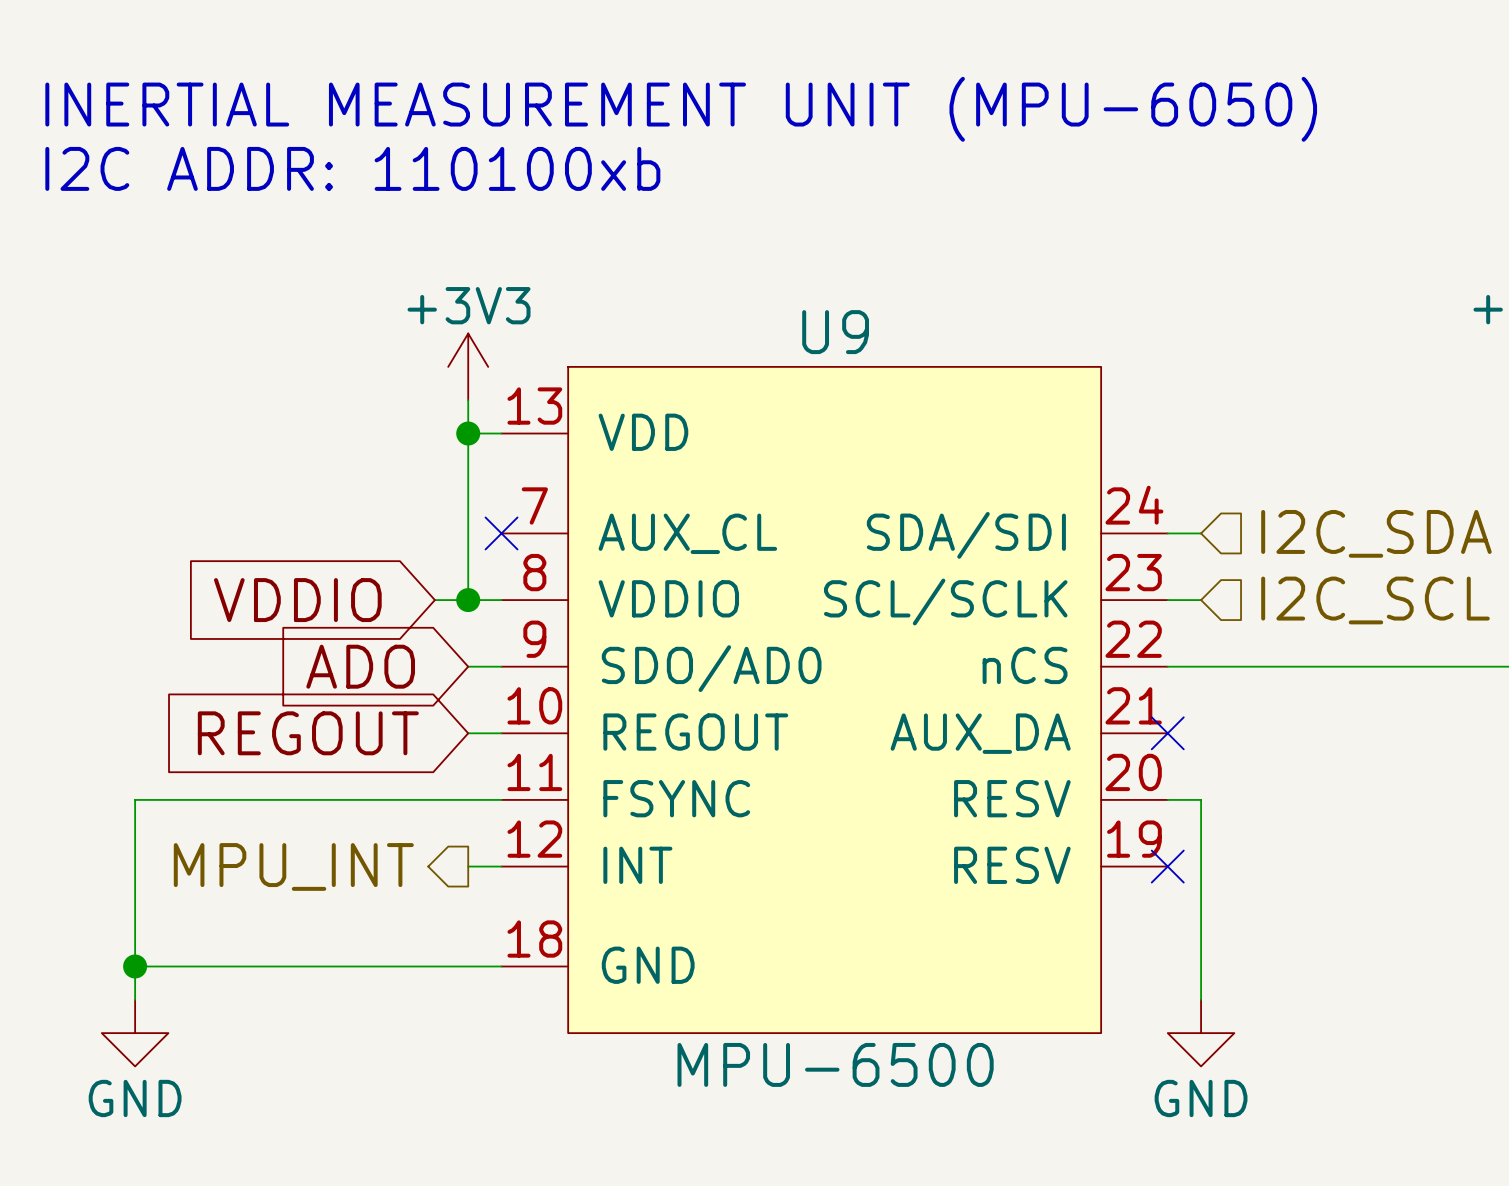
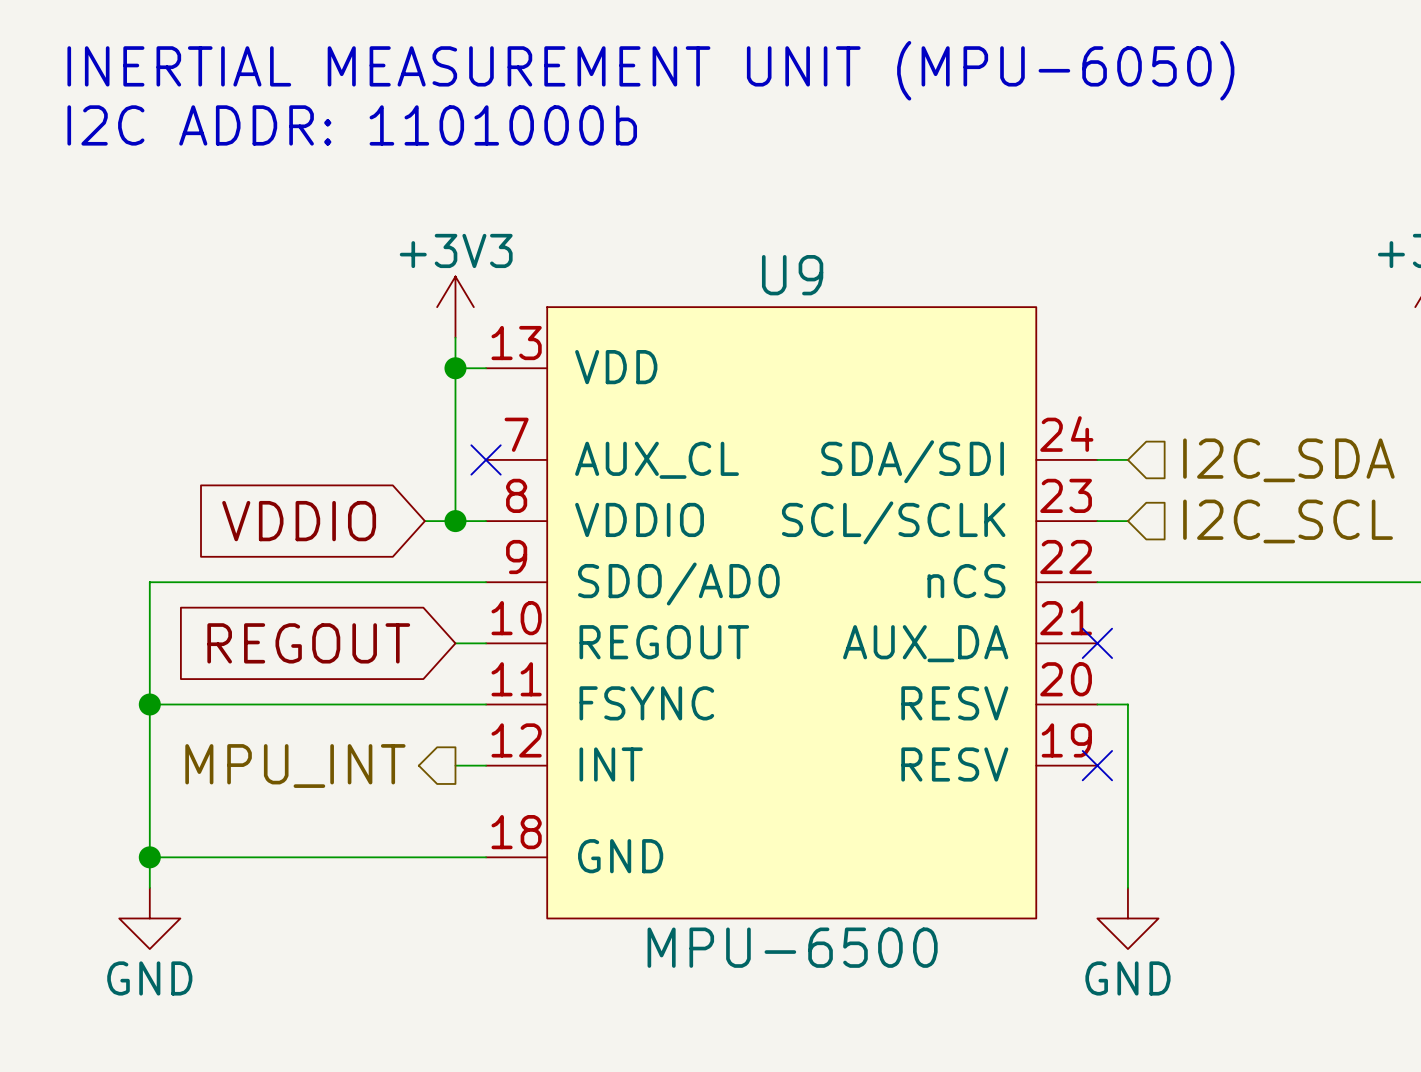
text: I2C ADDR: 110100xb (352, 168) -> I2C ADDR: 1101000b (352, 125)
global label: ADO (360, 666) -> none
wire: none -> (455, 582) (149, 582) (149, 704)
junction: none -> (149, 704)

